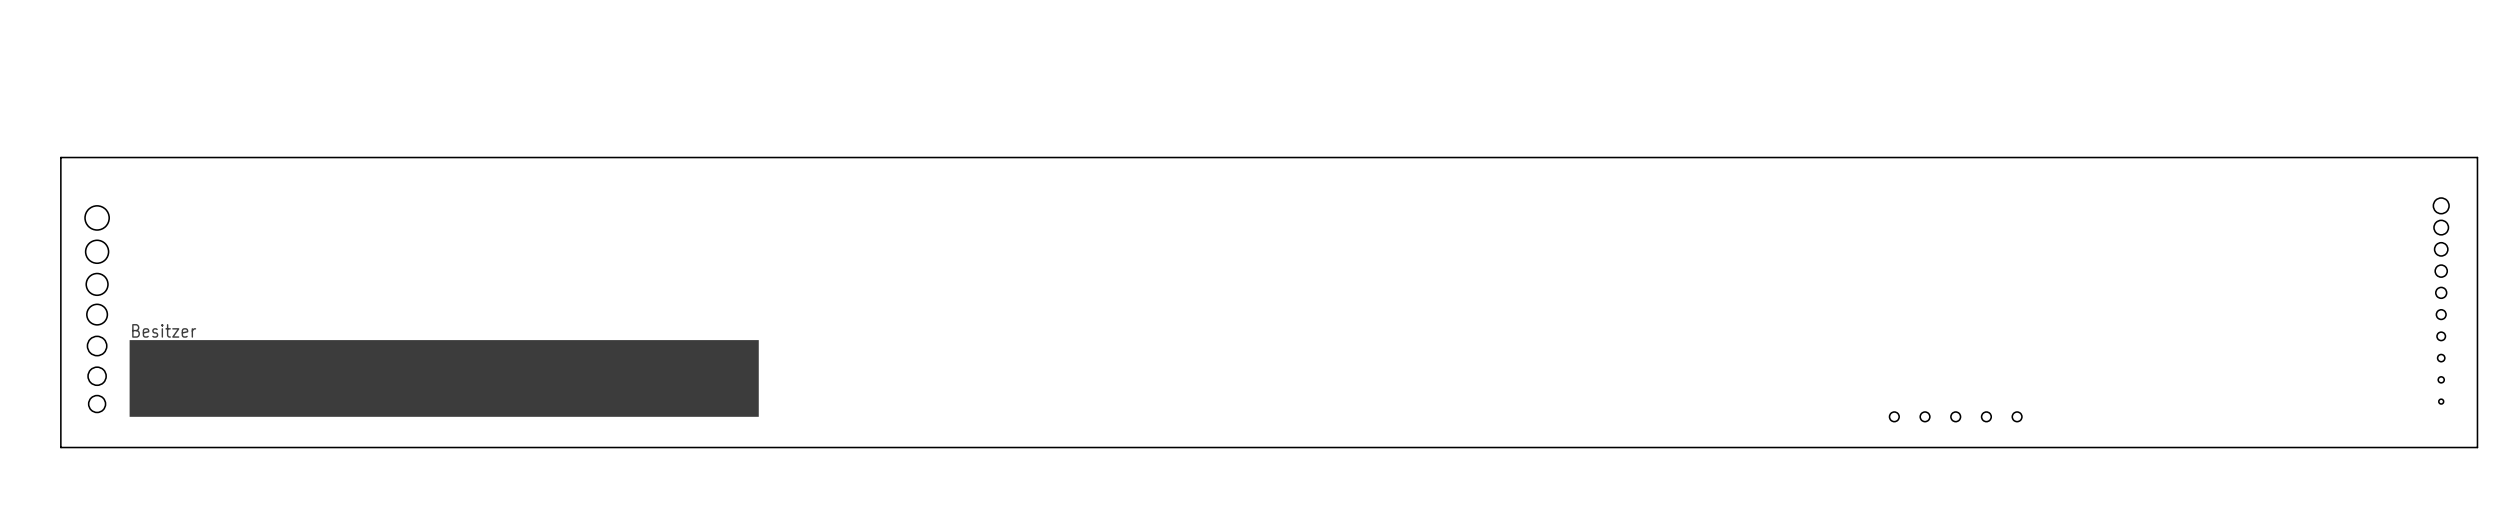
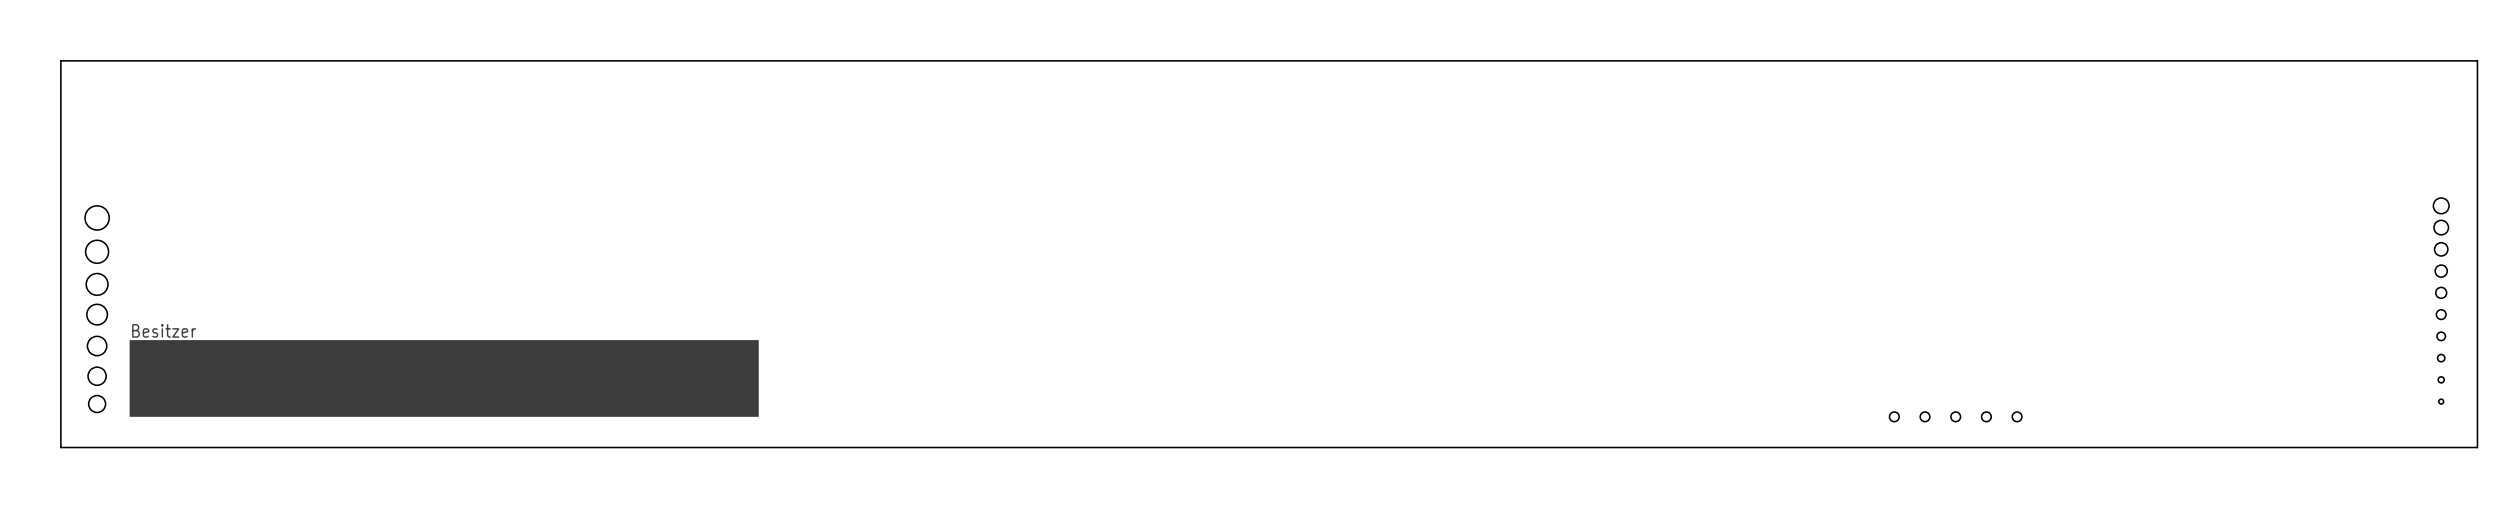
board edge: (2477, 157) (60, 157) -> (2477, 157) (2477, 60) (60, 60) (60, 157)

